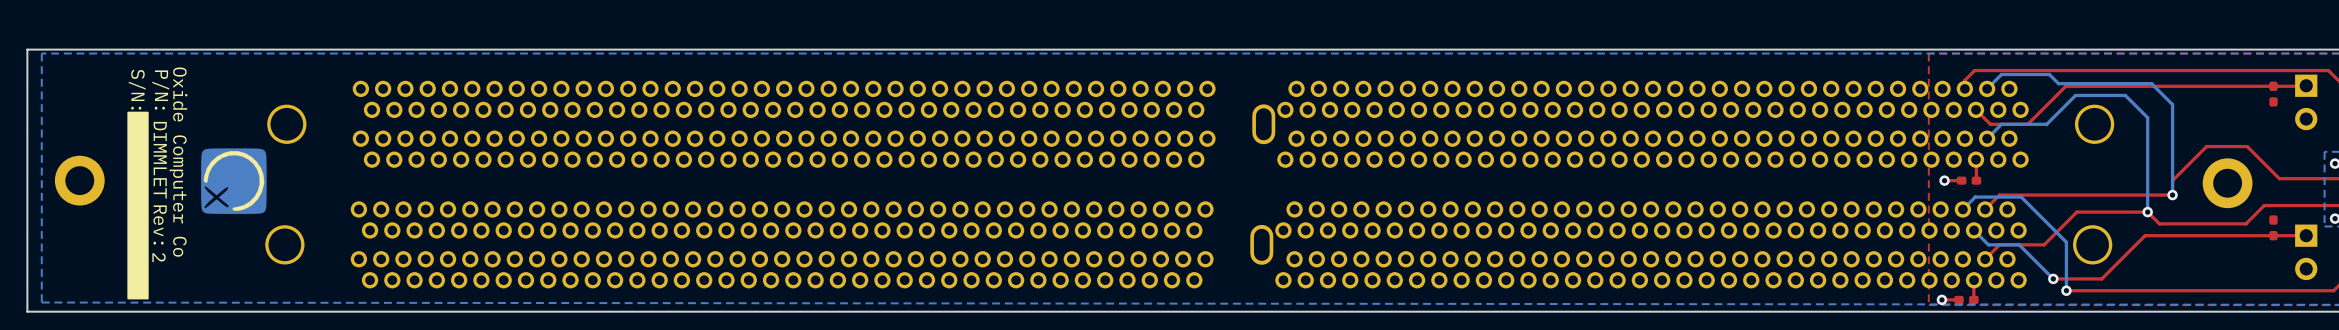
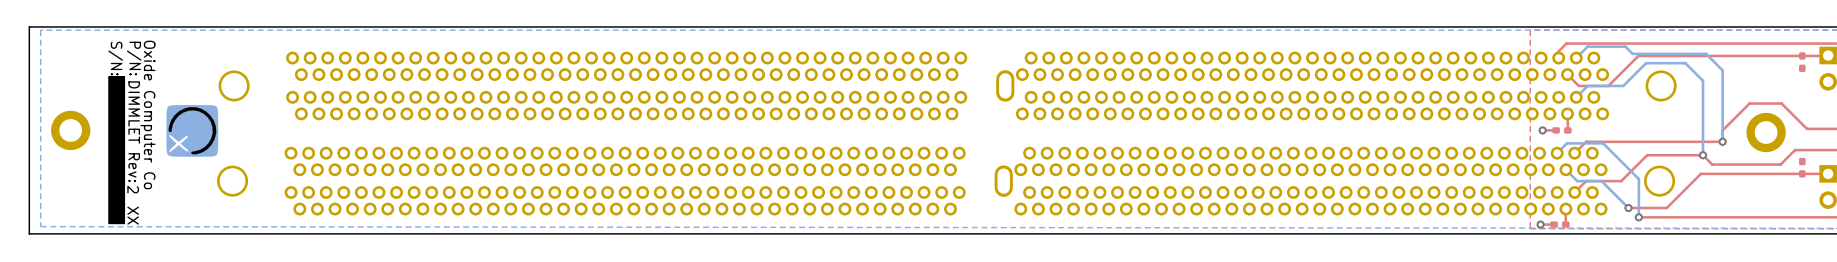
drawing shape: [127, 67, 188, 300] -> [108, 40, 156, 225]

